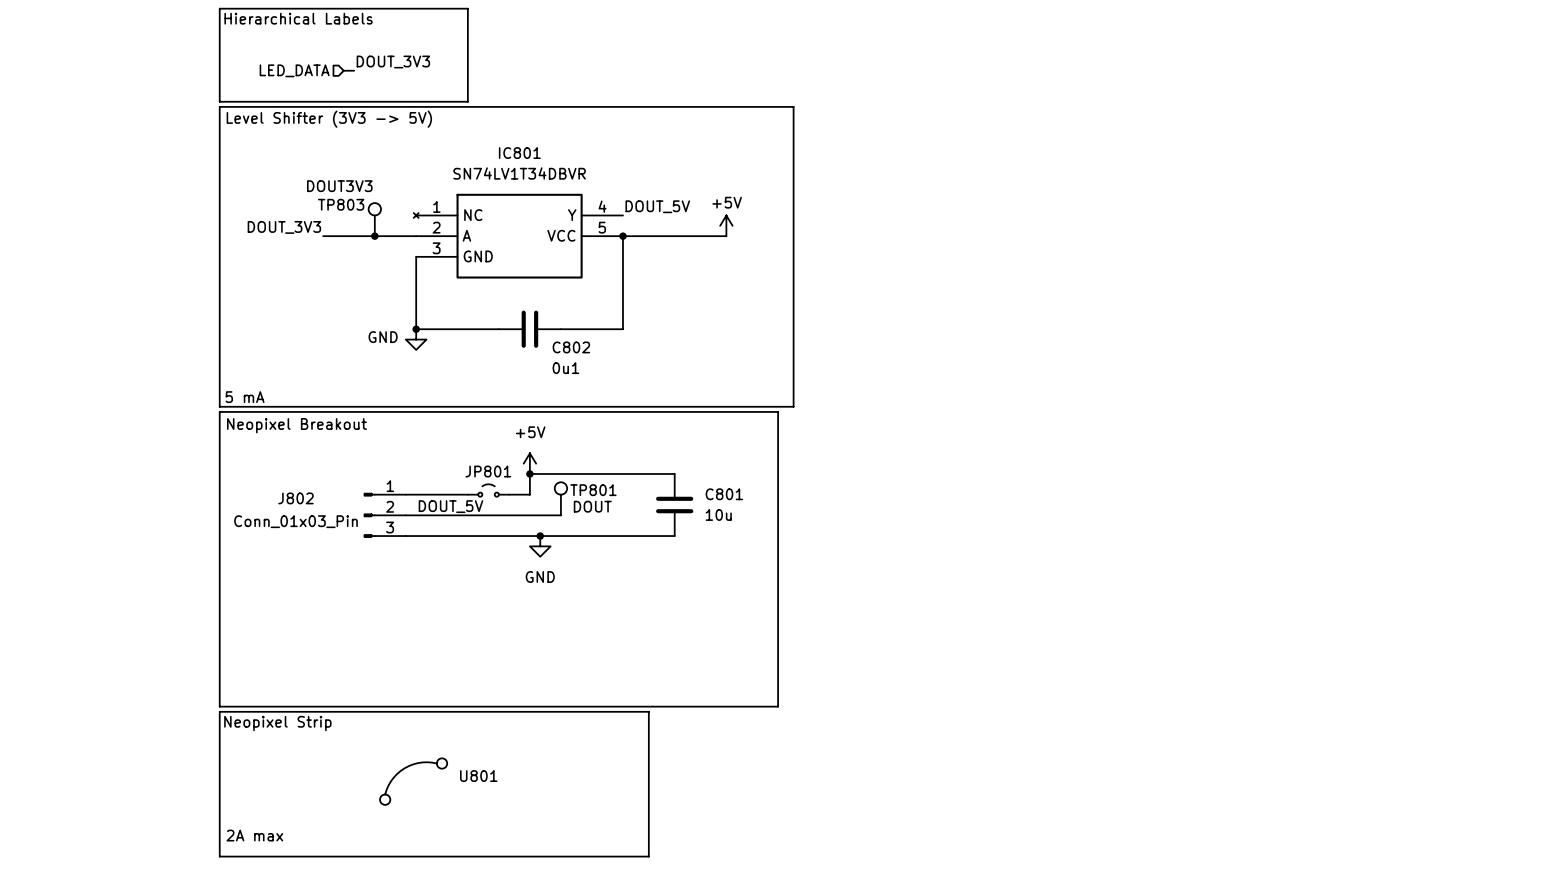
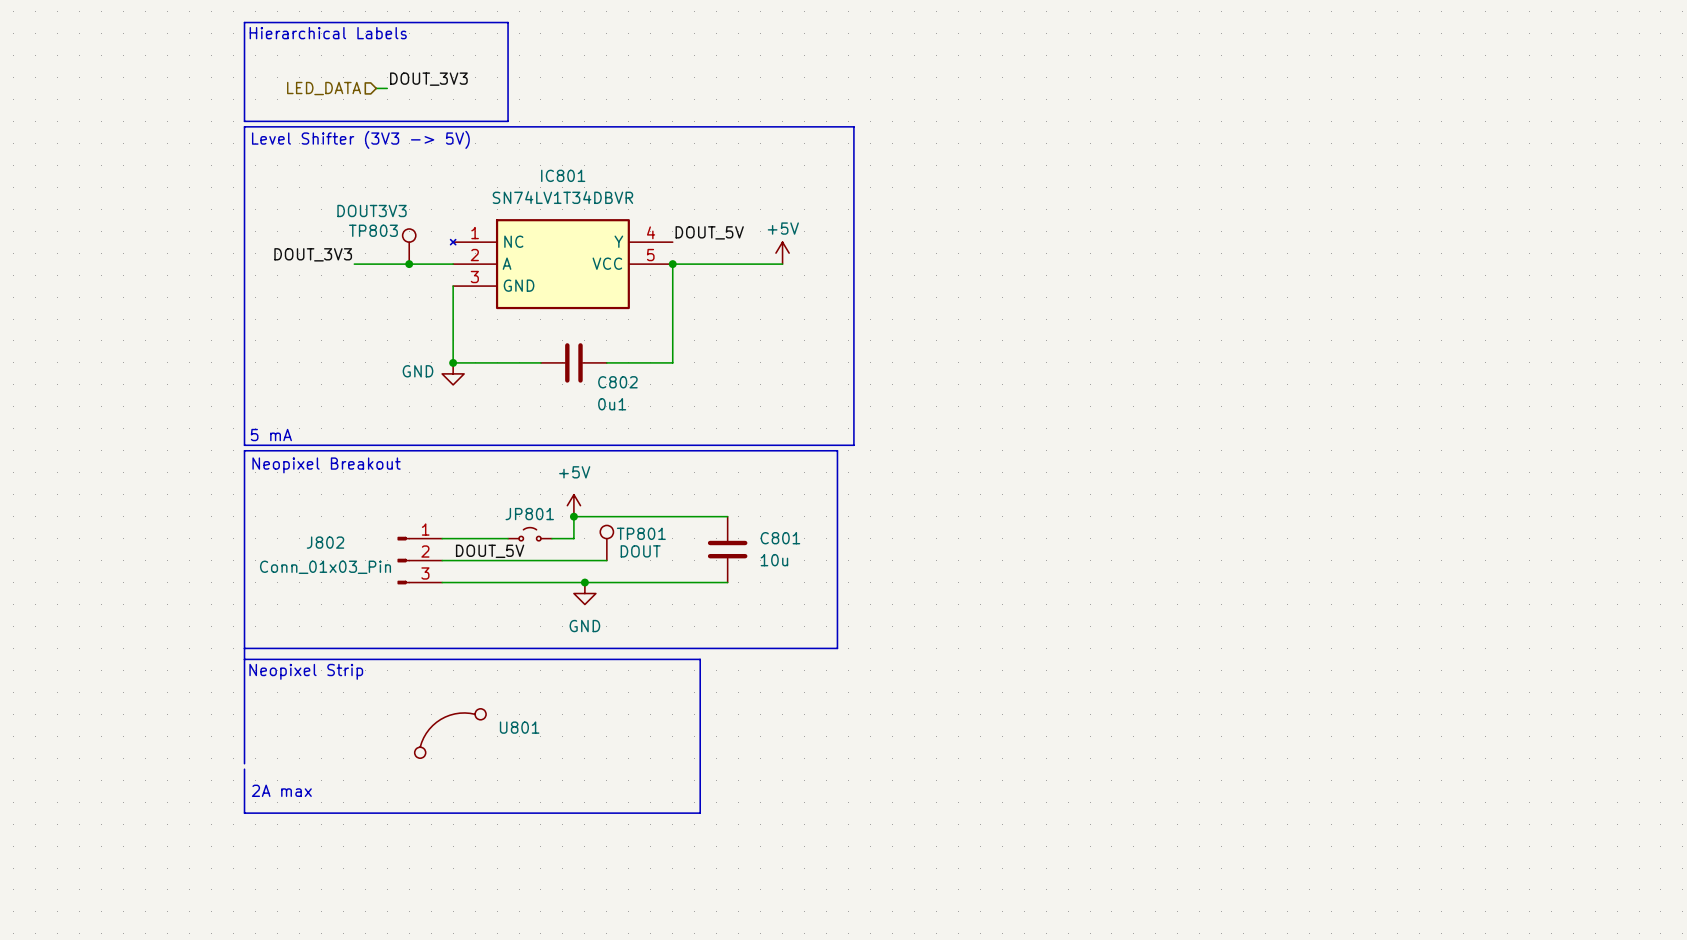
line: (778, 598) (778, 706) (219, 706) -> (837, 648) (244, 648)
line: (219, 711) (648, 711) -> (244, 659) (700, 659) (700, 769)
text position: Neopixel Strip (277, 723) -> Neopixel Strip (306, 671)
line: (219, 753) (219, 856) (648, 856) (648, 753) -> (244, 813) (700, 813)
U801 position: (413, 781) -> (450, 733)
text position: 2A max (254, 835) -> 2A max (281, 790)

